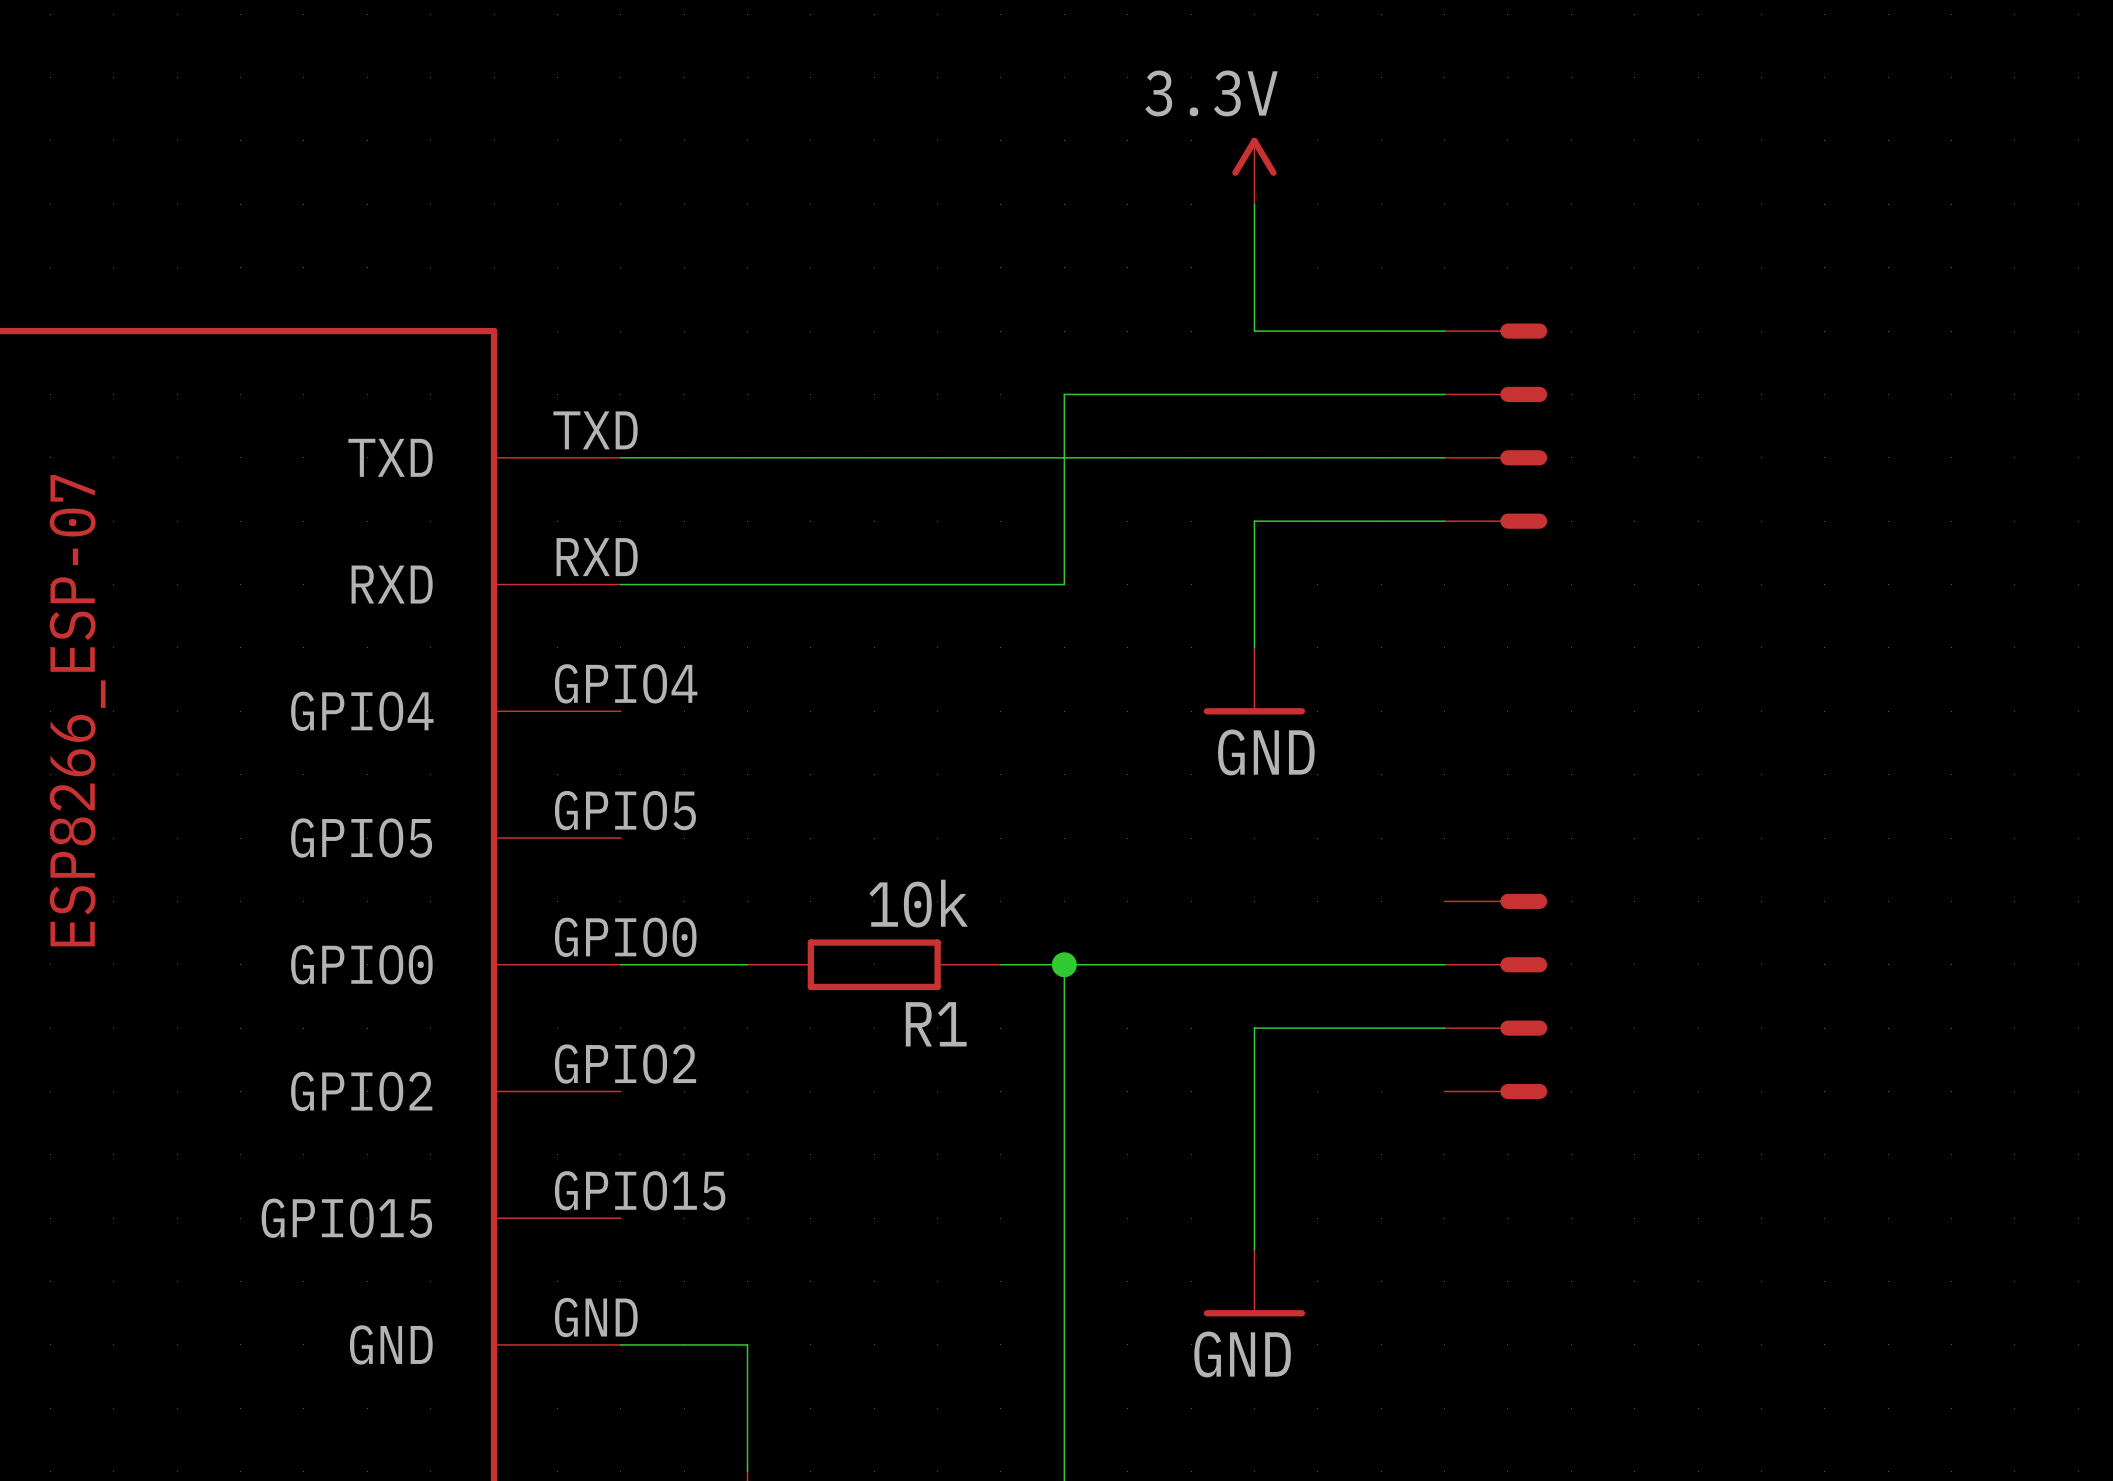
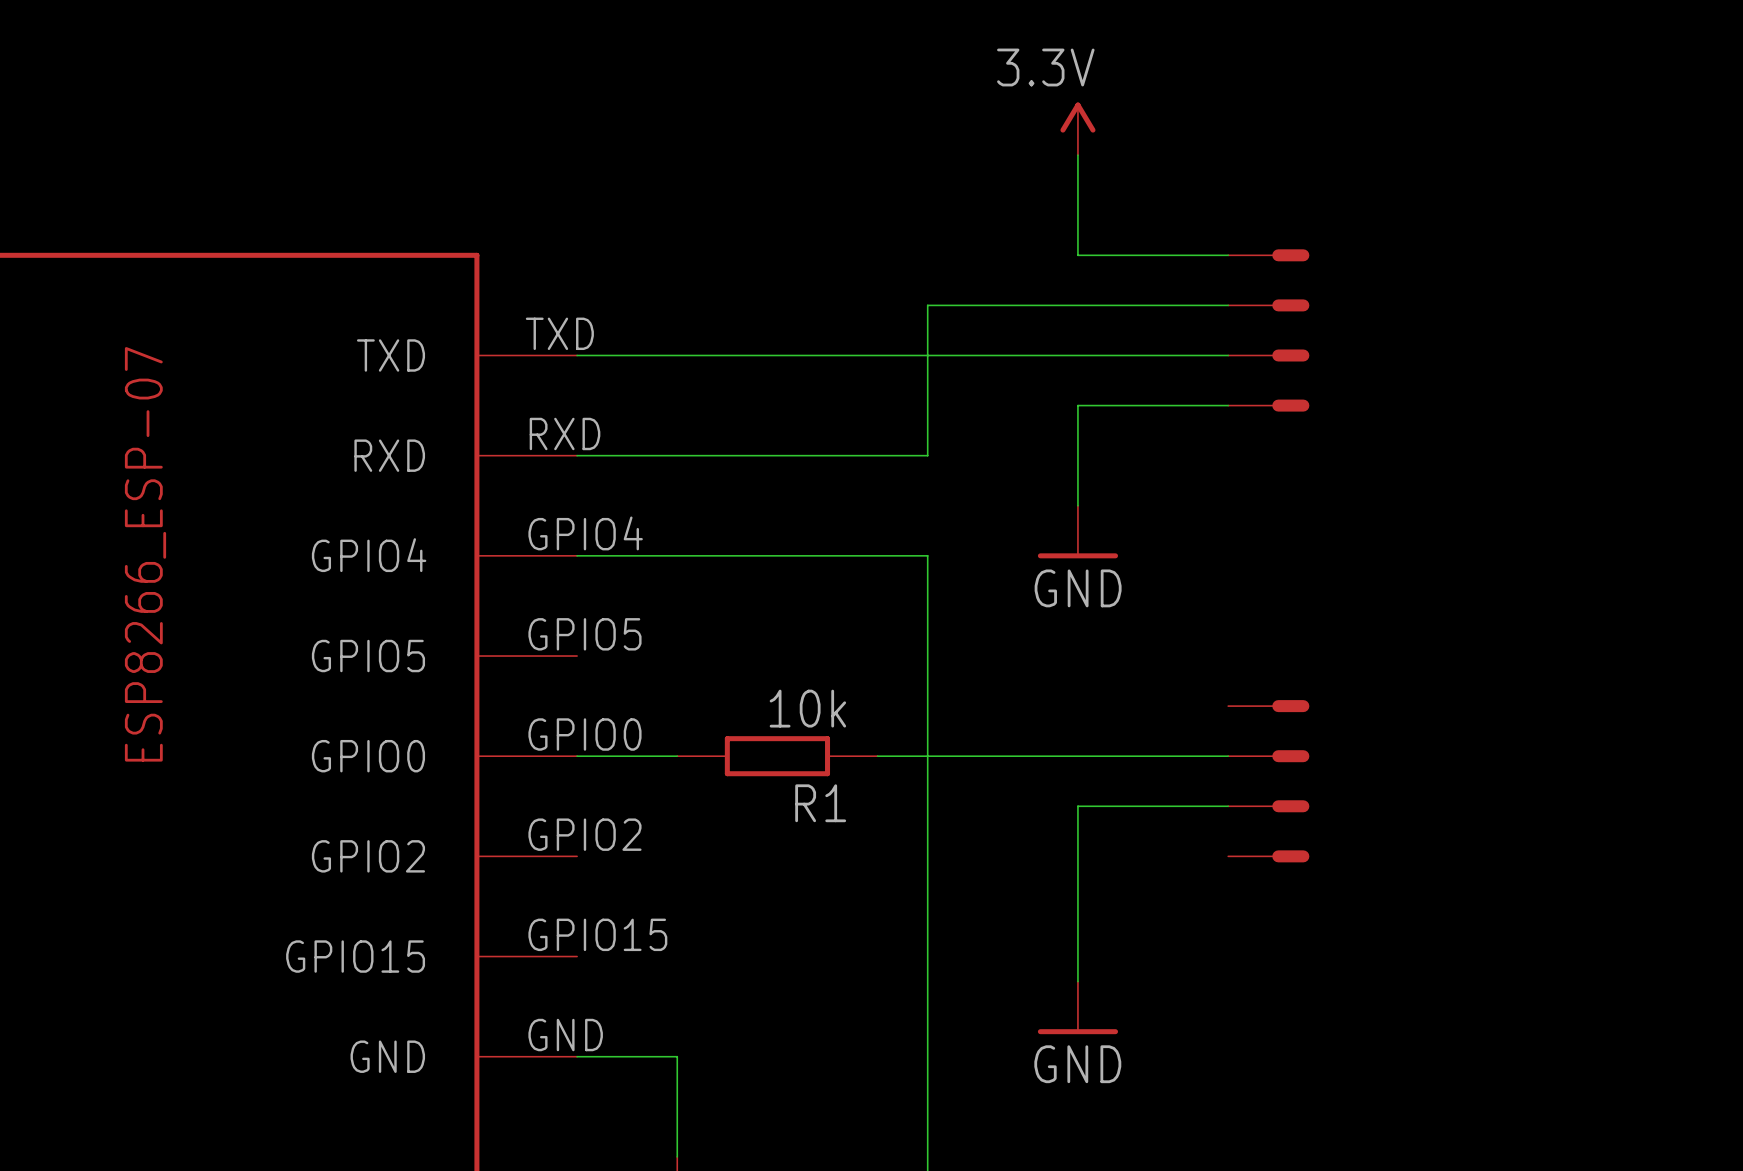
wire: none -> (577, 555) (927, 555) (927, 756)
junction: (1064, 964) -> none

